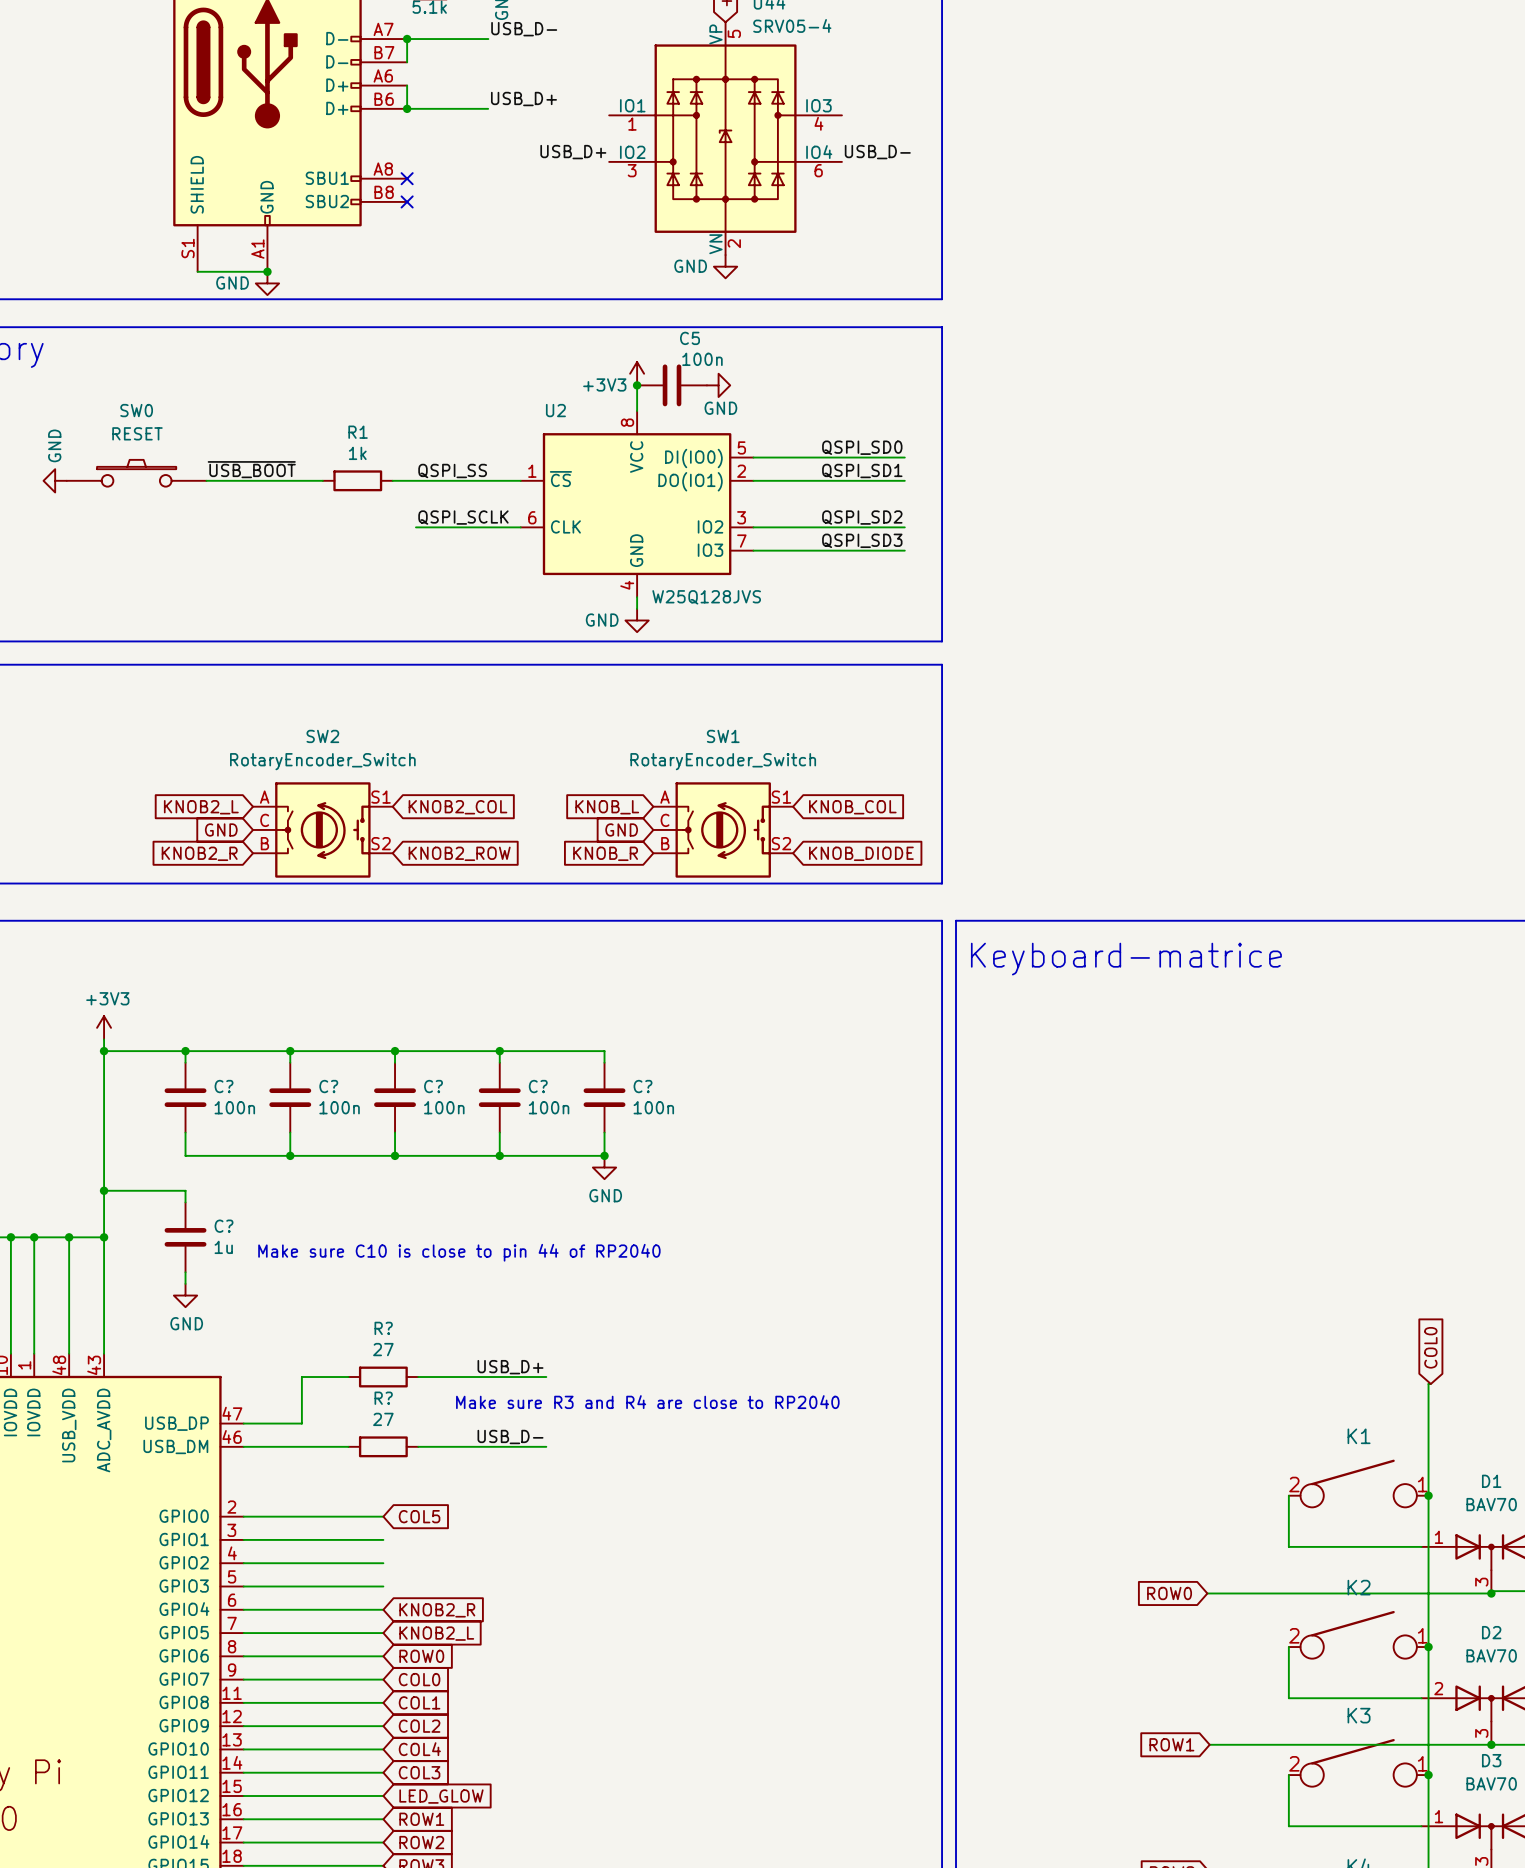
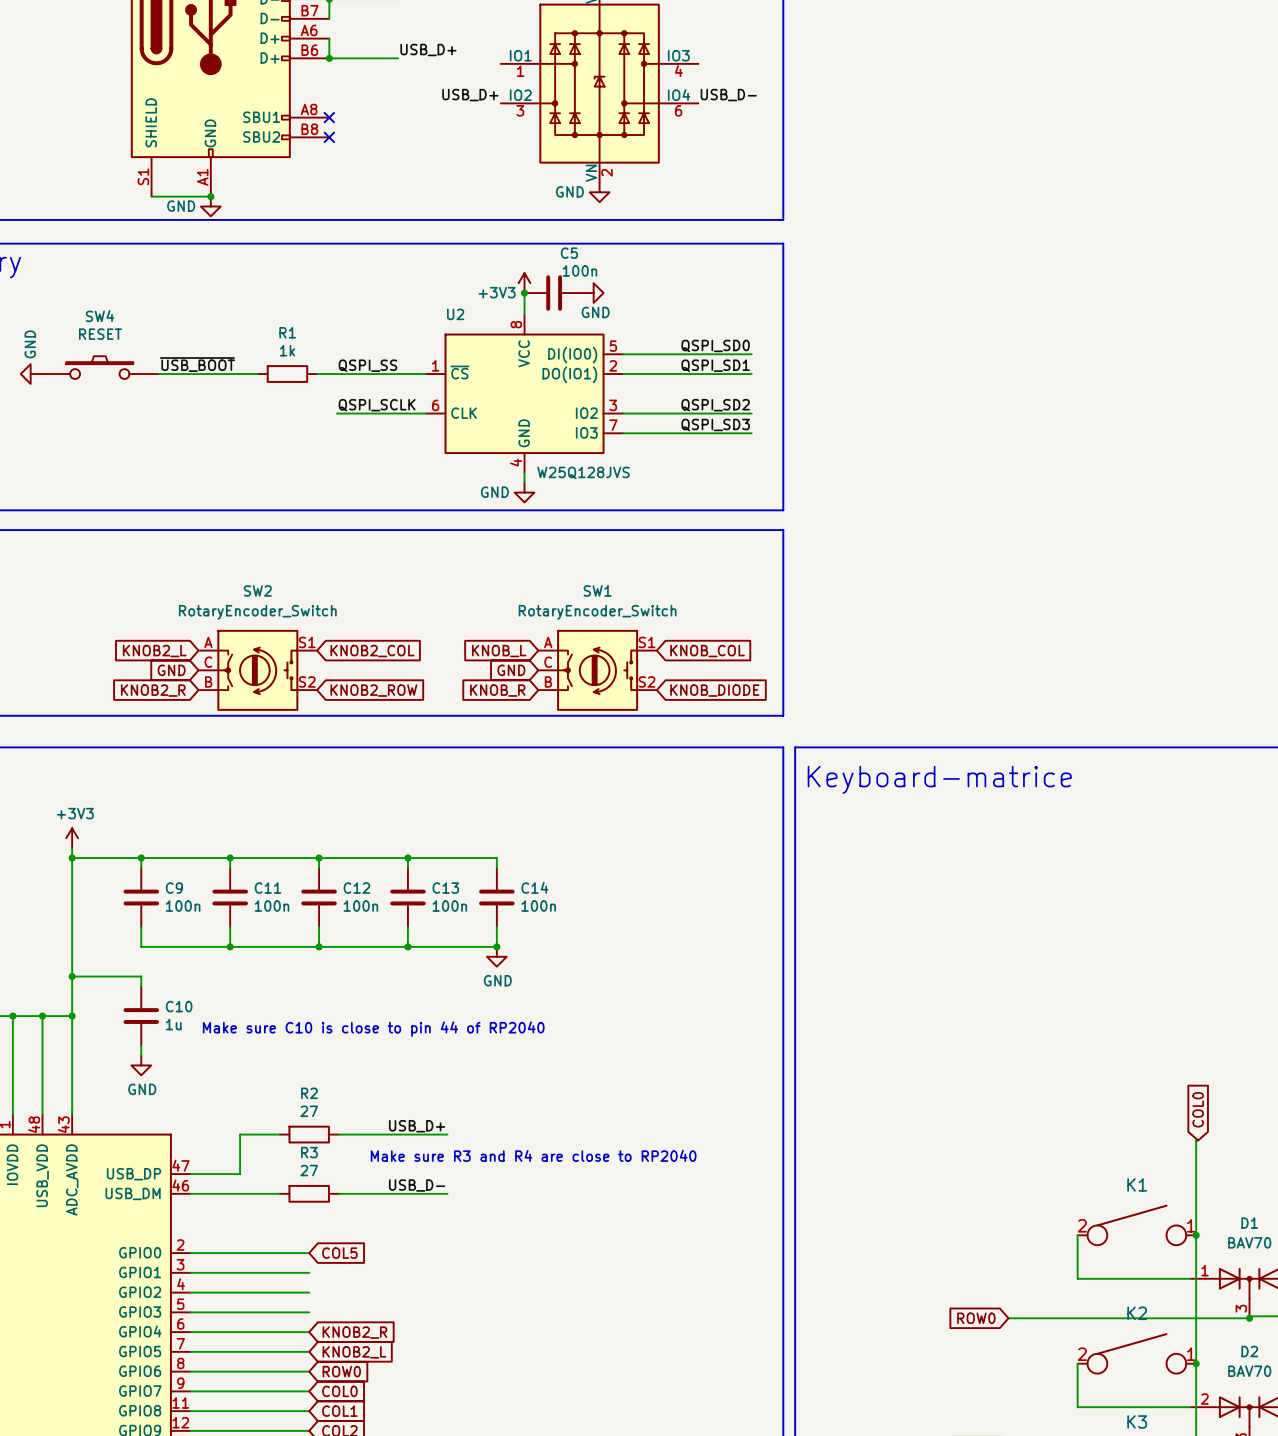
SW0 name: SW0 (136, 410) -> SW4 (100, 316)
C? name: C? (224, 1086) -> C9 (174, 888)
C? name: C? (328, 1086) -> C11 (268, 888)
C? name: C? (433, 1086) -> C12 (356, 888)
C? name: C? (538, 1086) -> C13 (445, 888)
C? name: C? (643, 1086) -> C14 (534, 887)
C? name: C? (224, 1226) -> C10 (179, 1006)
R? name: R? (383, 1328) -> R2 (309, 1093)
R? name: R? (383, 1398) -> R3 (309, 1152)

